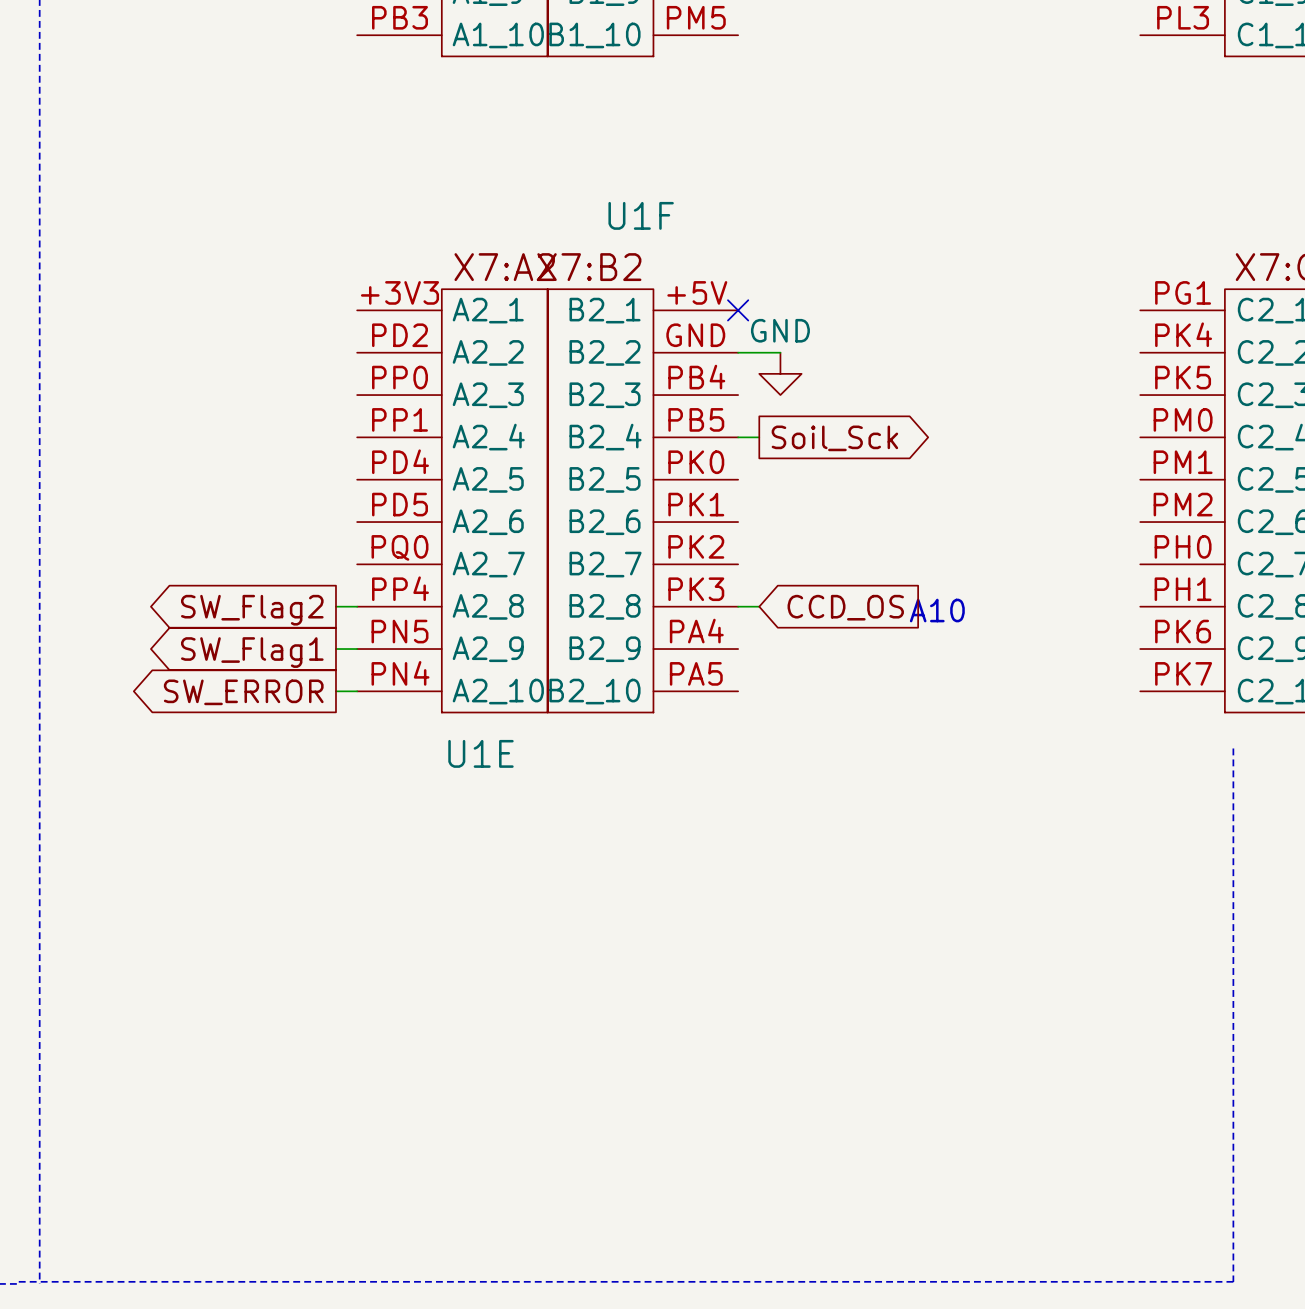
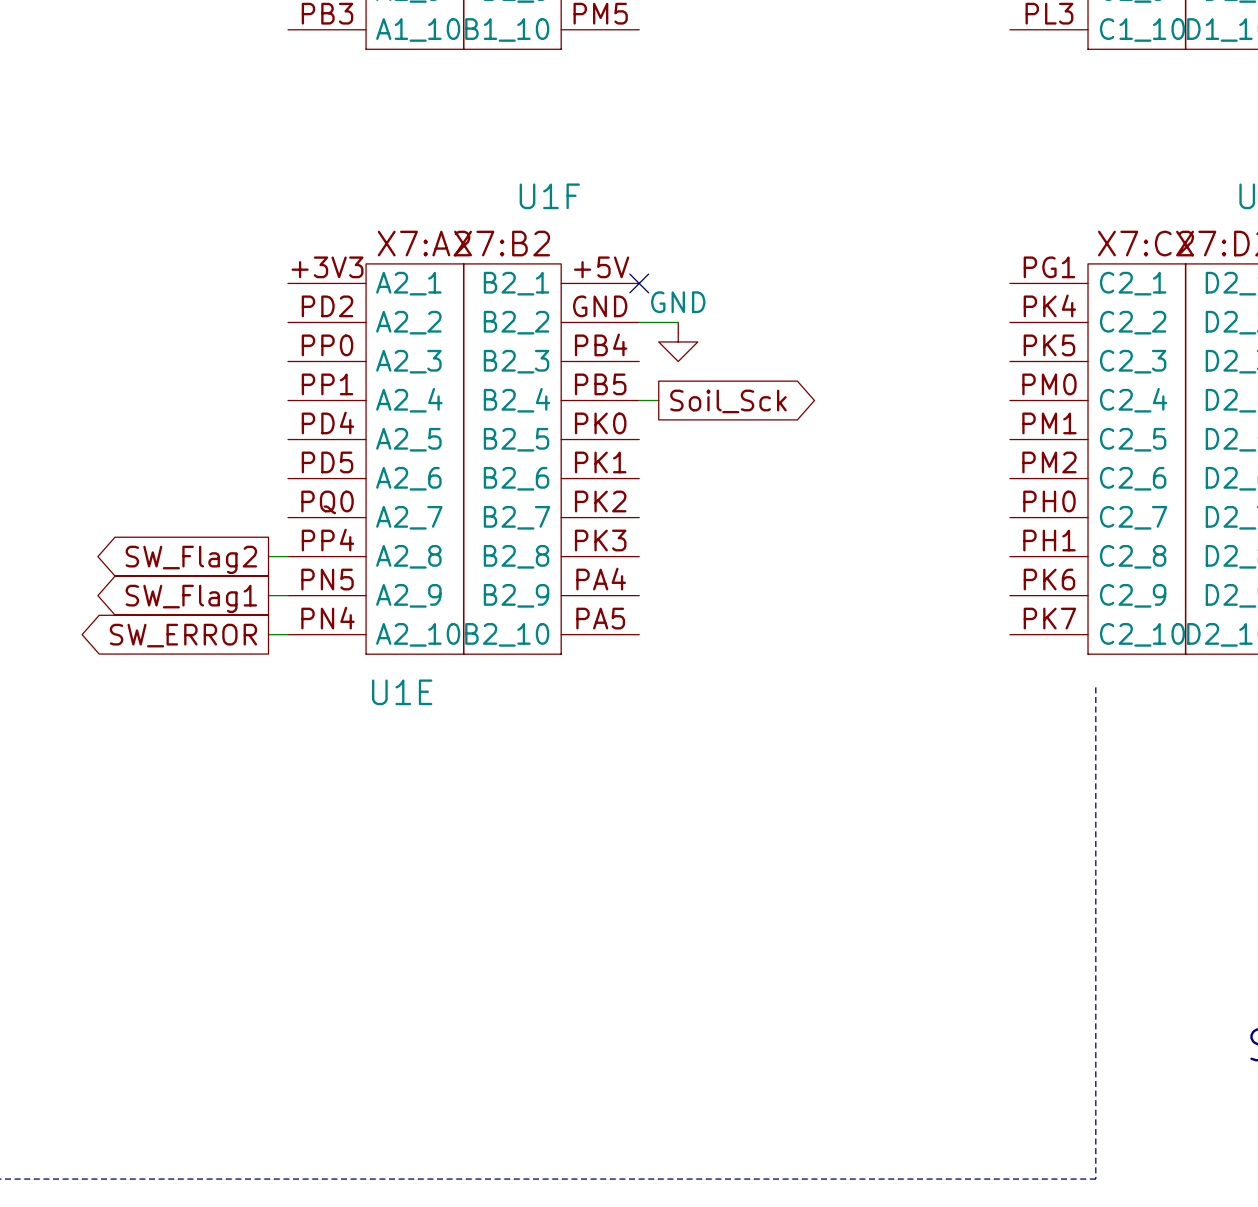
wire: (738, 606) (759, 606) -> none
global label: CCD_OS (845, 607) -> none
text: A10 (937, 610) -> none

